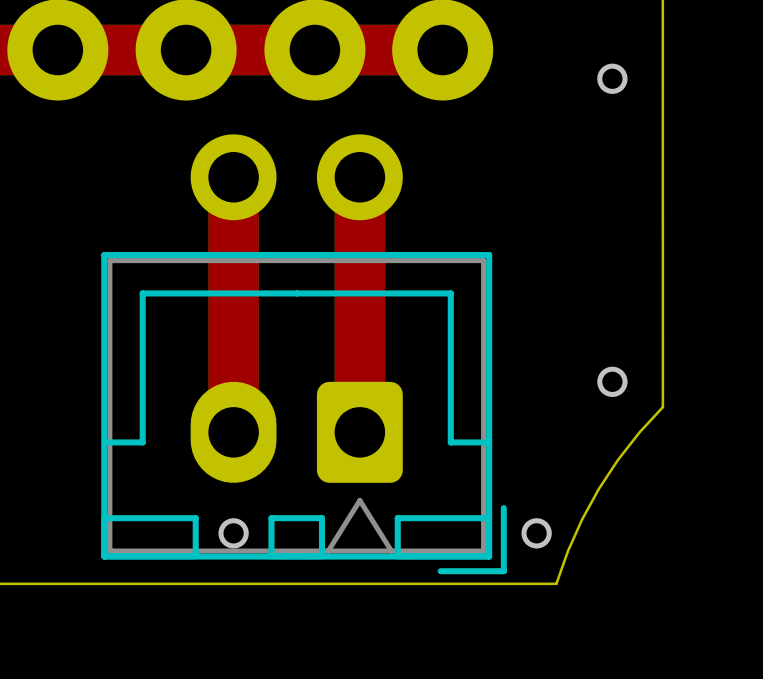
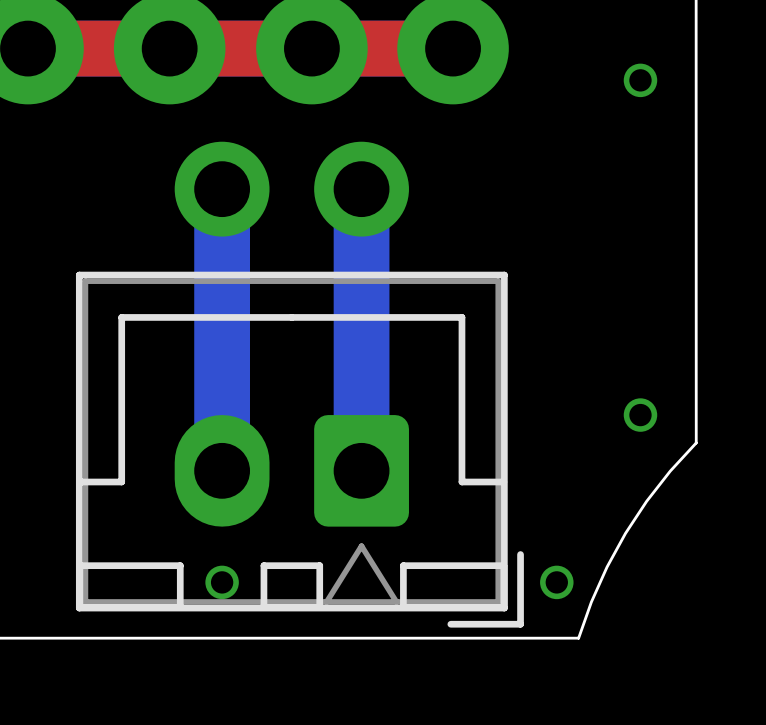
top track: (233, 177) (233, 432) -> none
top track: (359, 177) (359, 432) -> none

